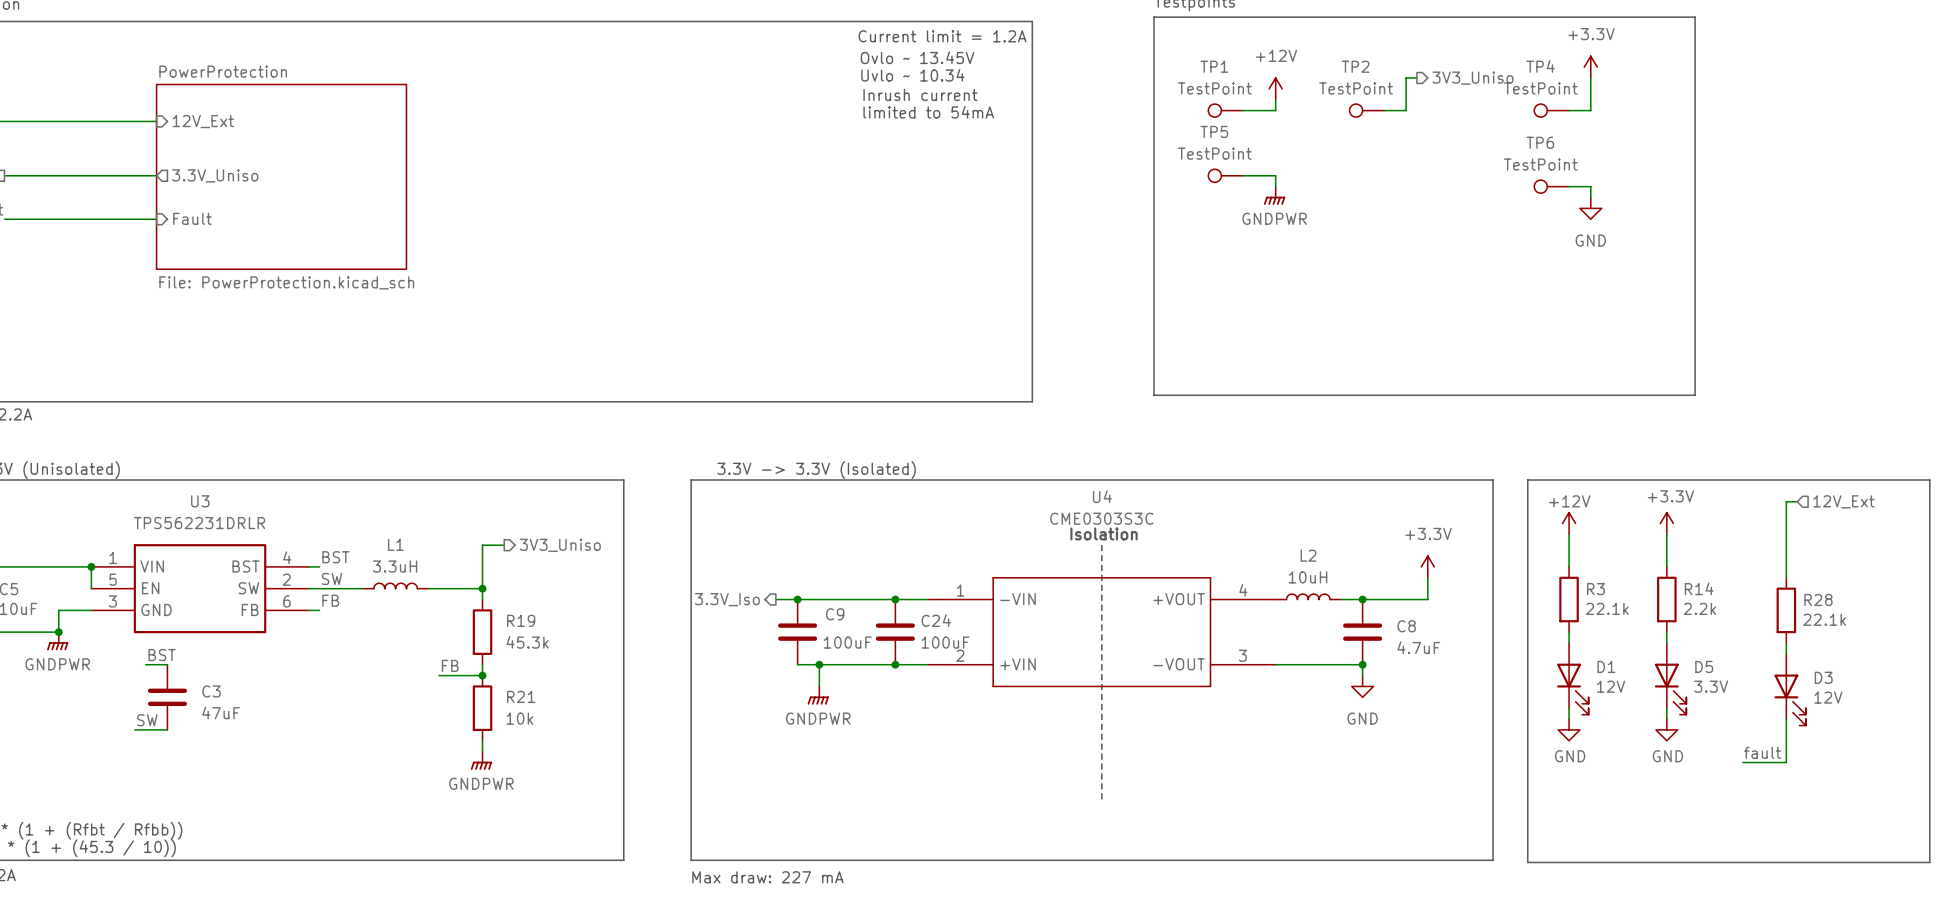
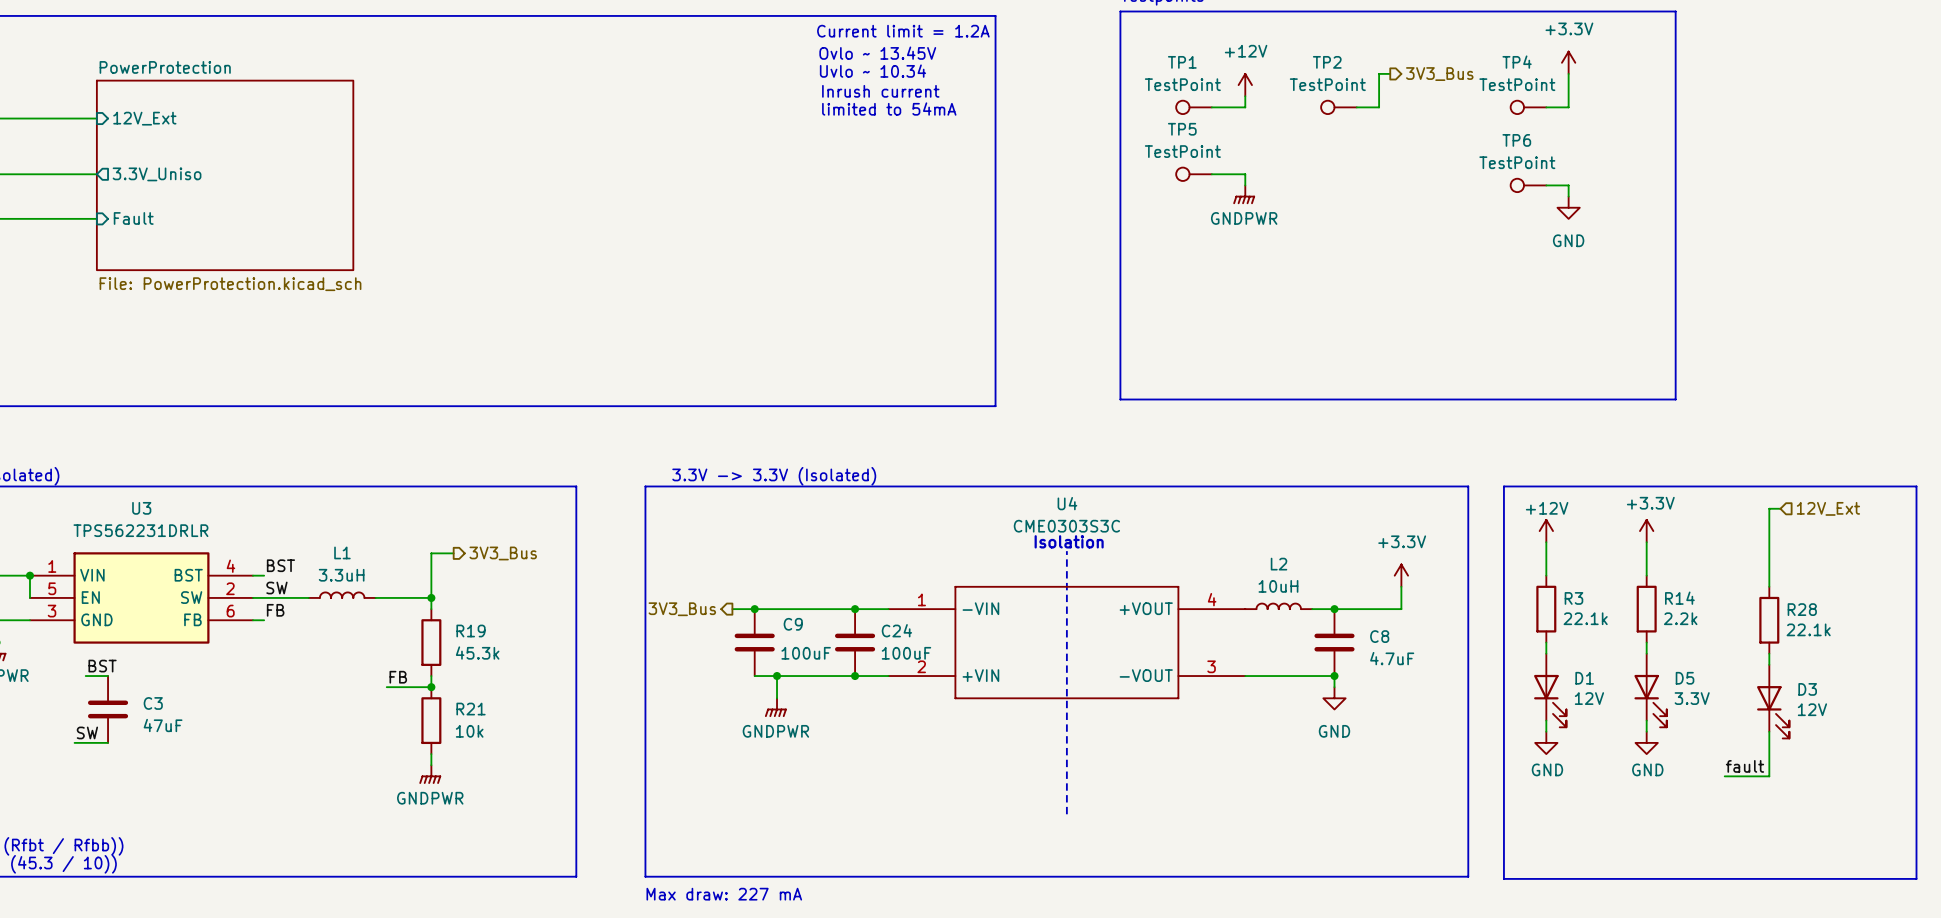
hierarchical label: 3V3_Uniso (1472, 78) -> 3V3_Bus (1439, 74)
hierarchical label: 3V3_Uniso (560, 545) -> 3V3_Bus (503, 553)
hierarchical label: 3.3V_Iso (727, 599) -> 3V3_Bus (682, 609)

